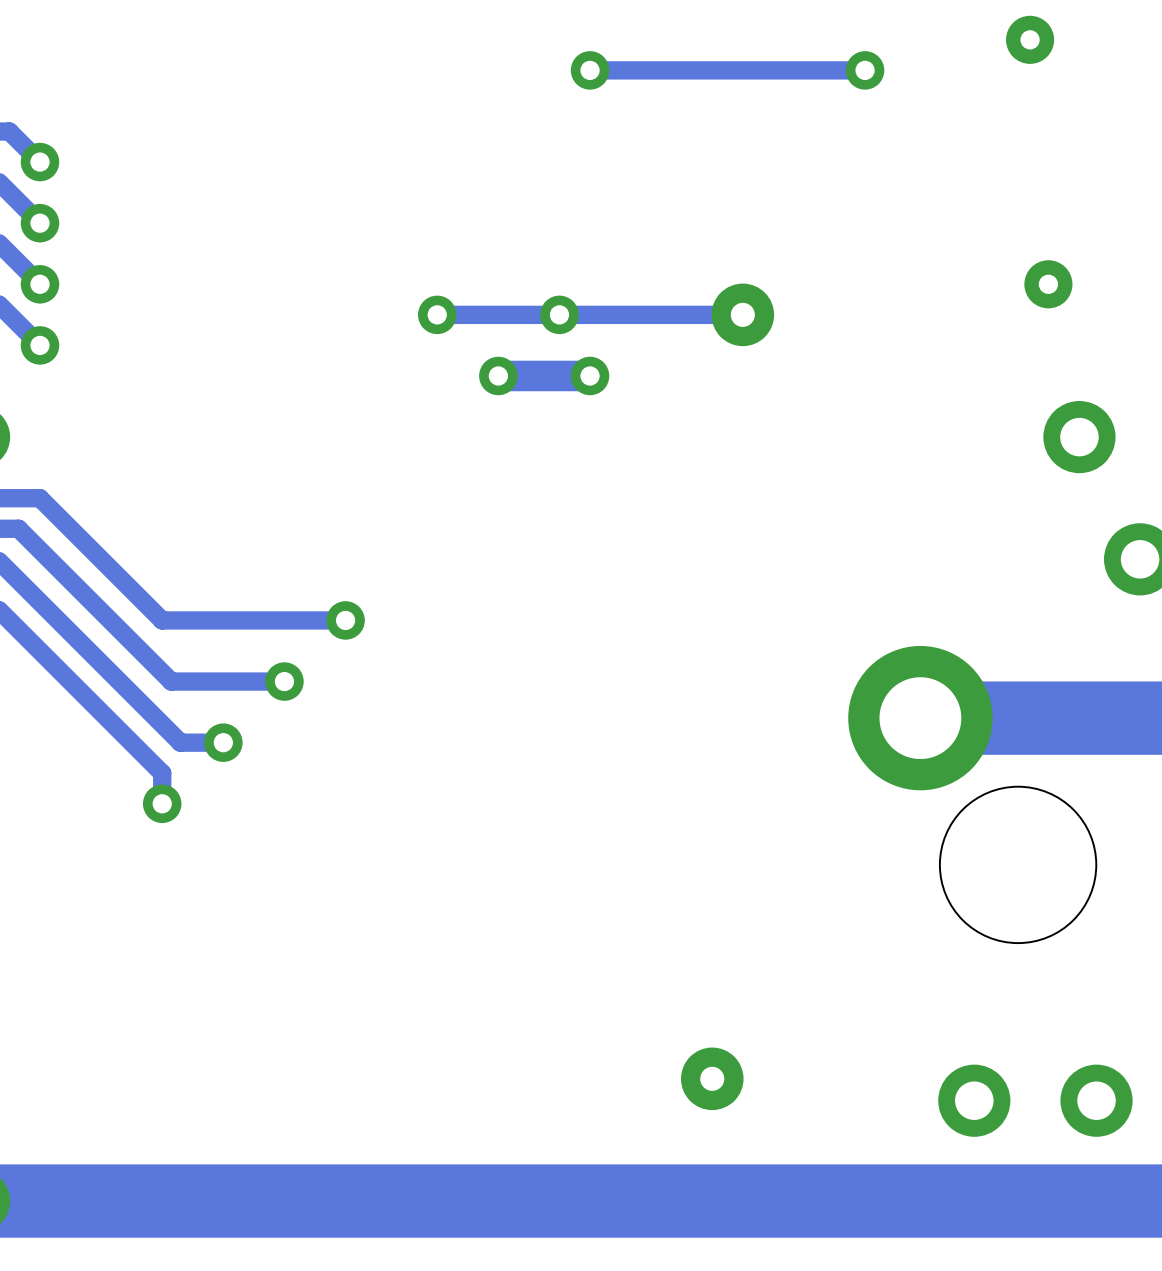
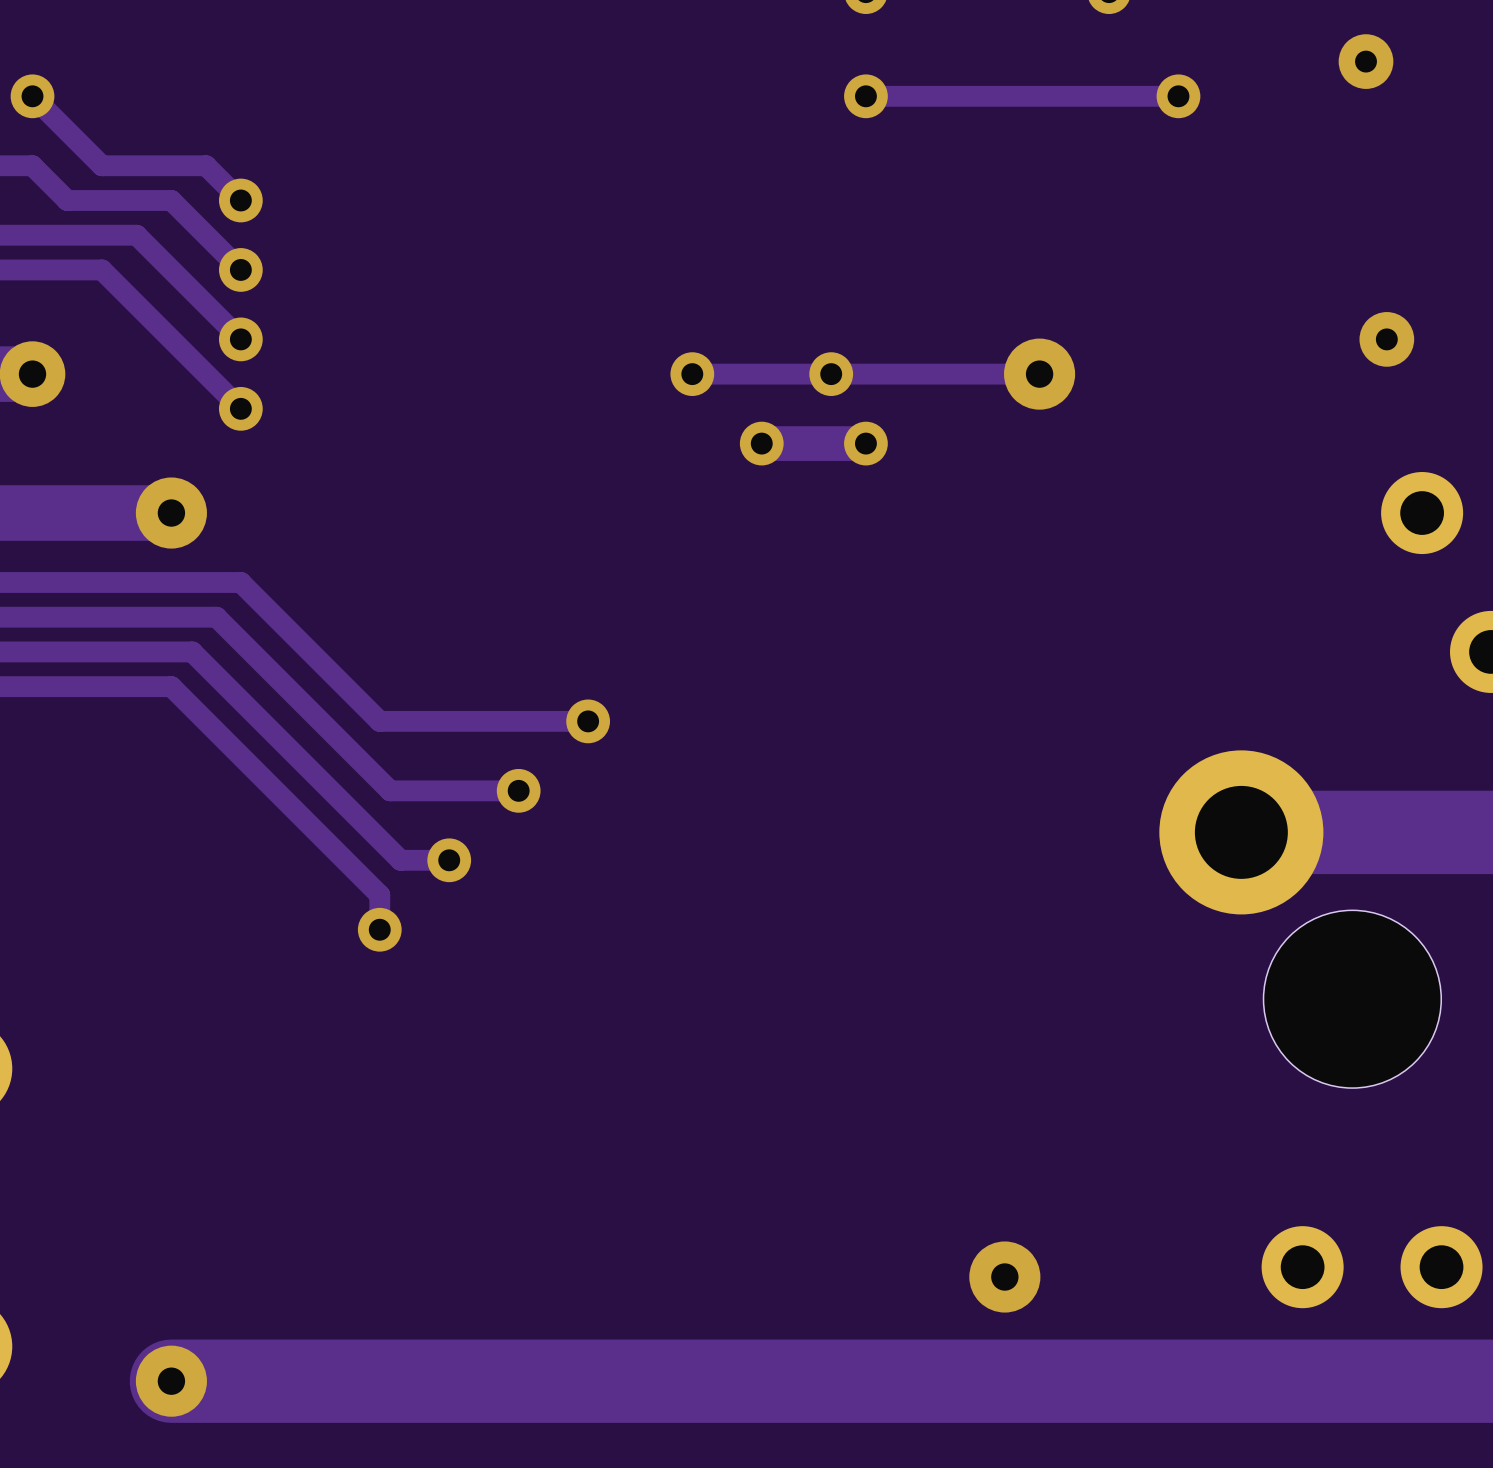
via position: (712, 1078) -> (1004, 1277)

